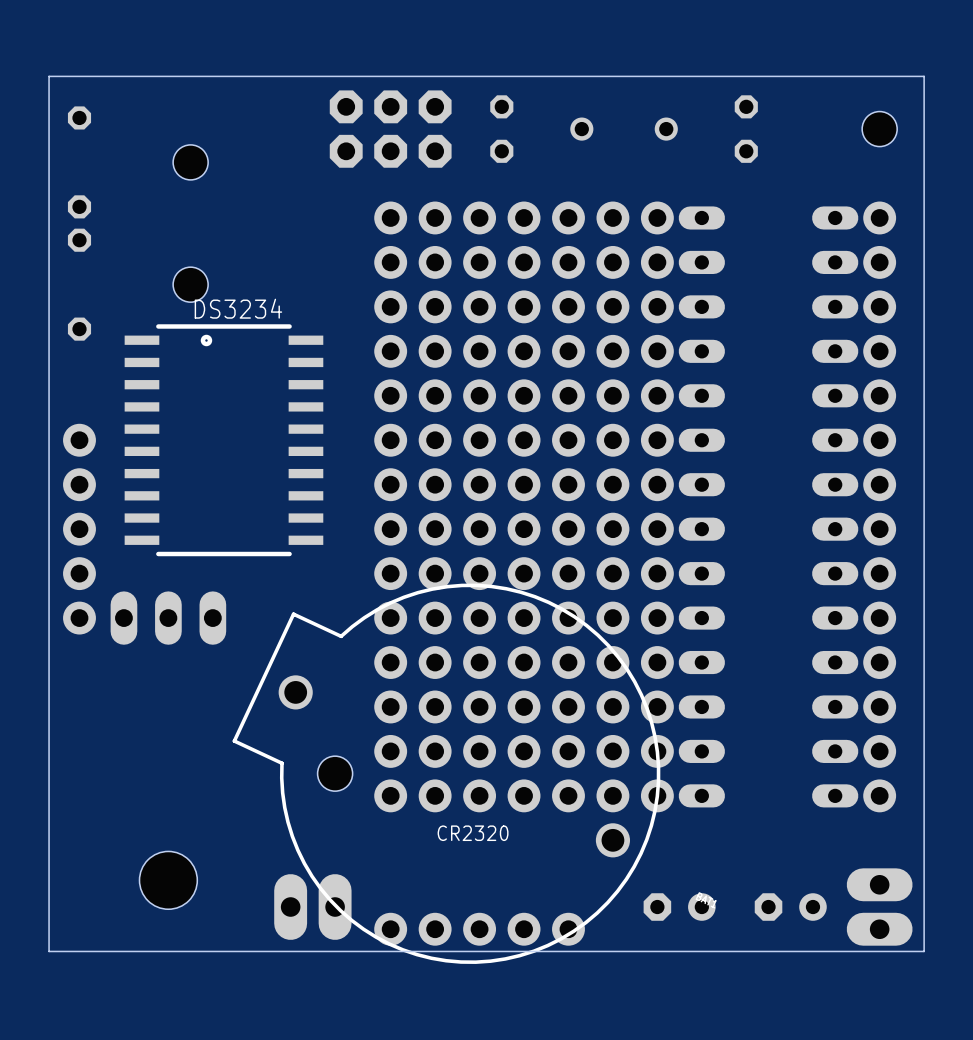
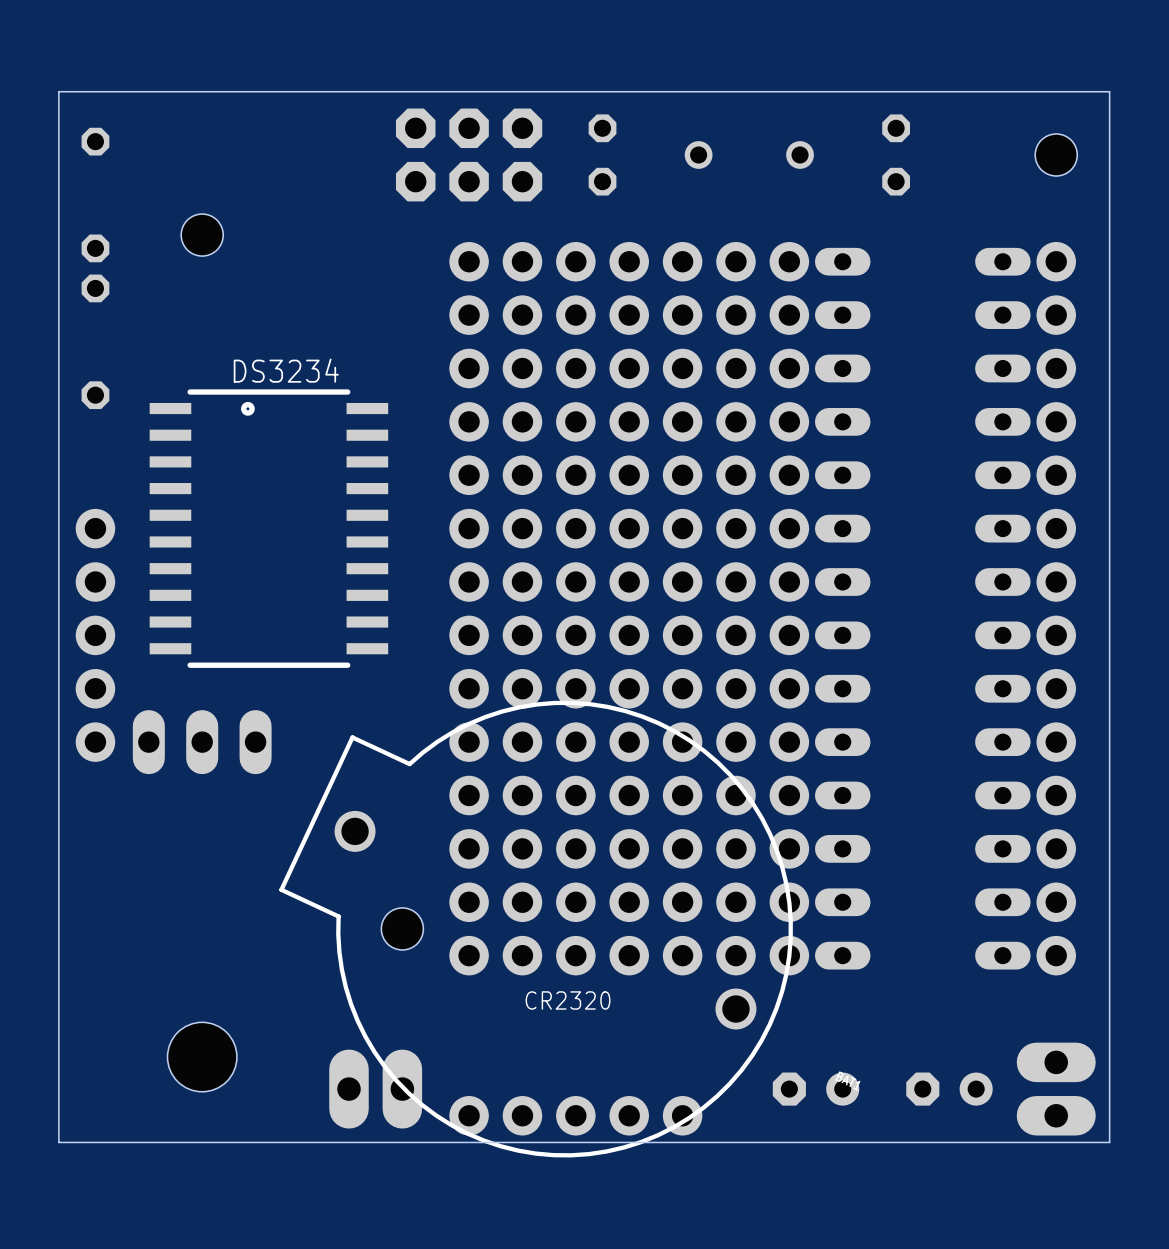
hole position: (190, 162) -> (202, 235)
hole: (190, 284) -> none

